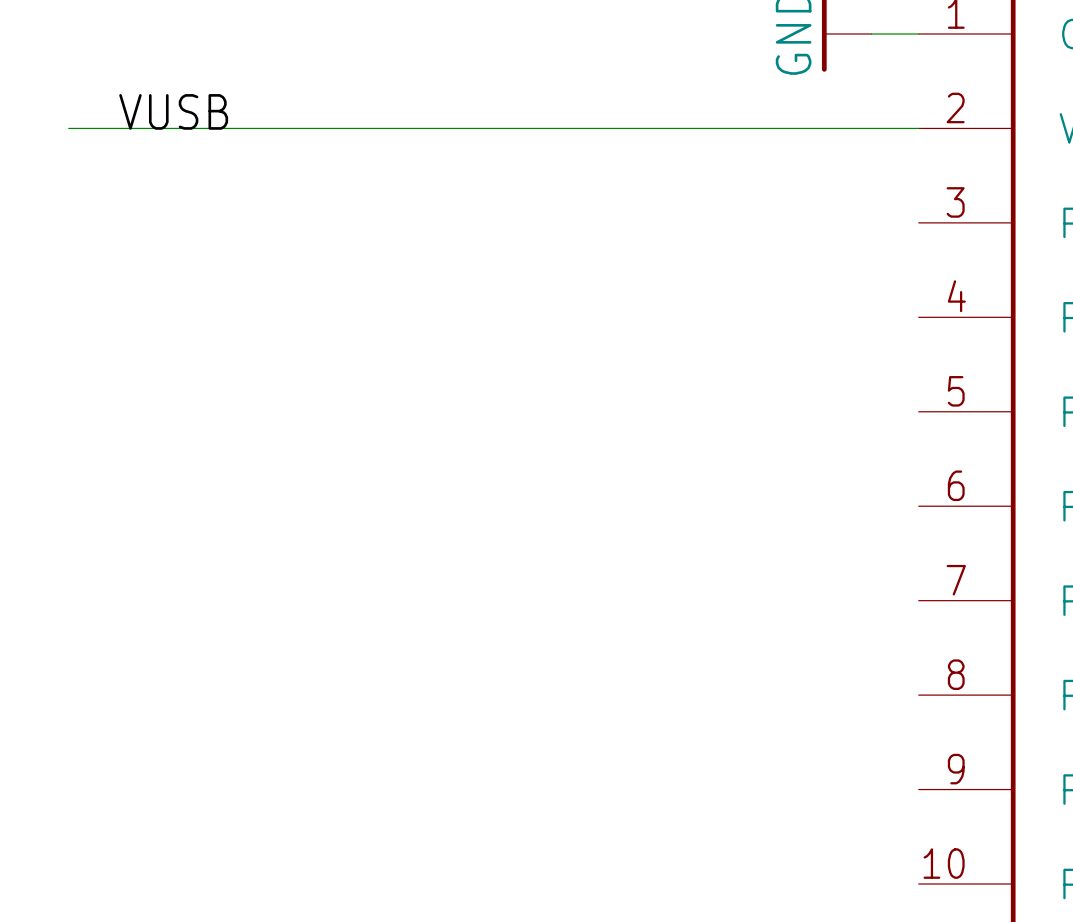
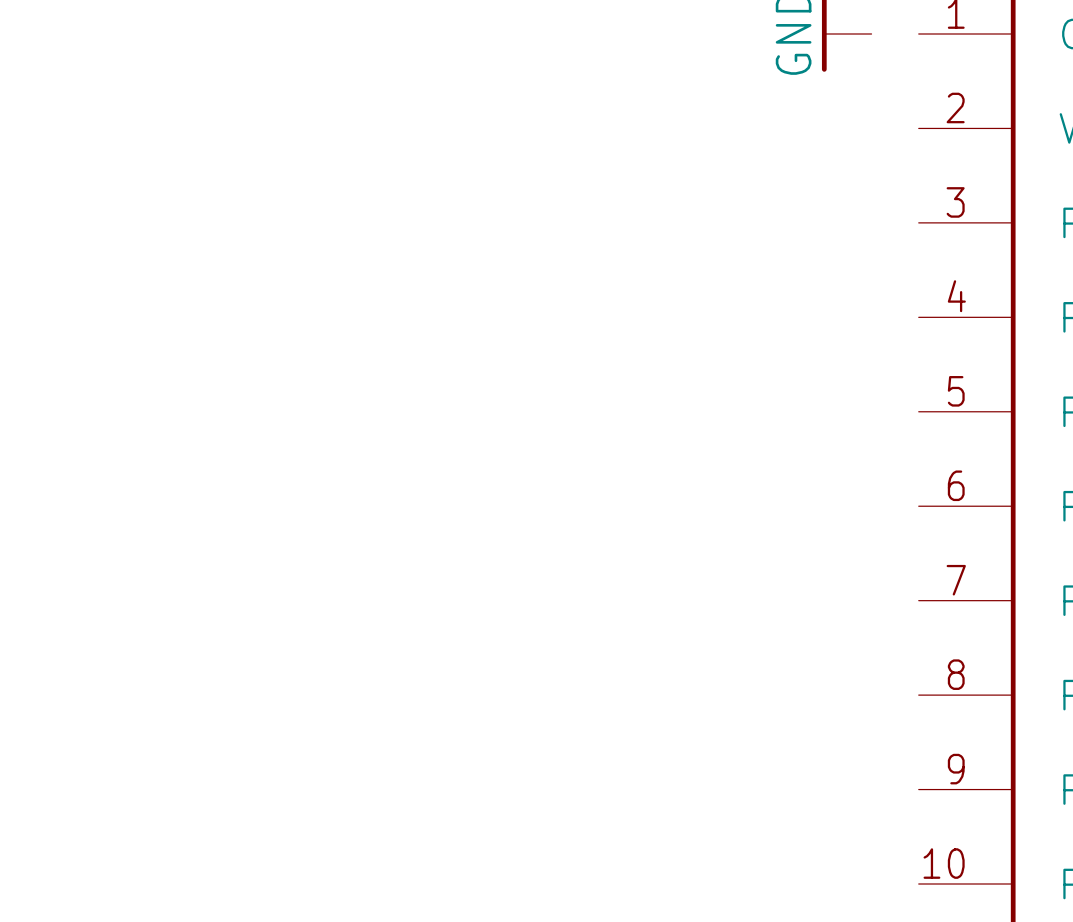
wire: (871, 33) (918, 33) -> none
label: VUSB (173, 111) -> none
wire: (68, 128) (918, 128) -> none

